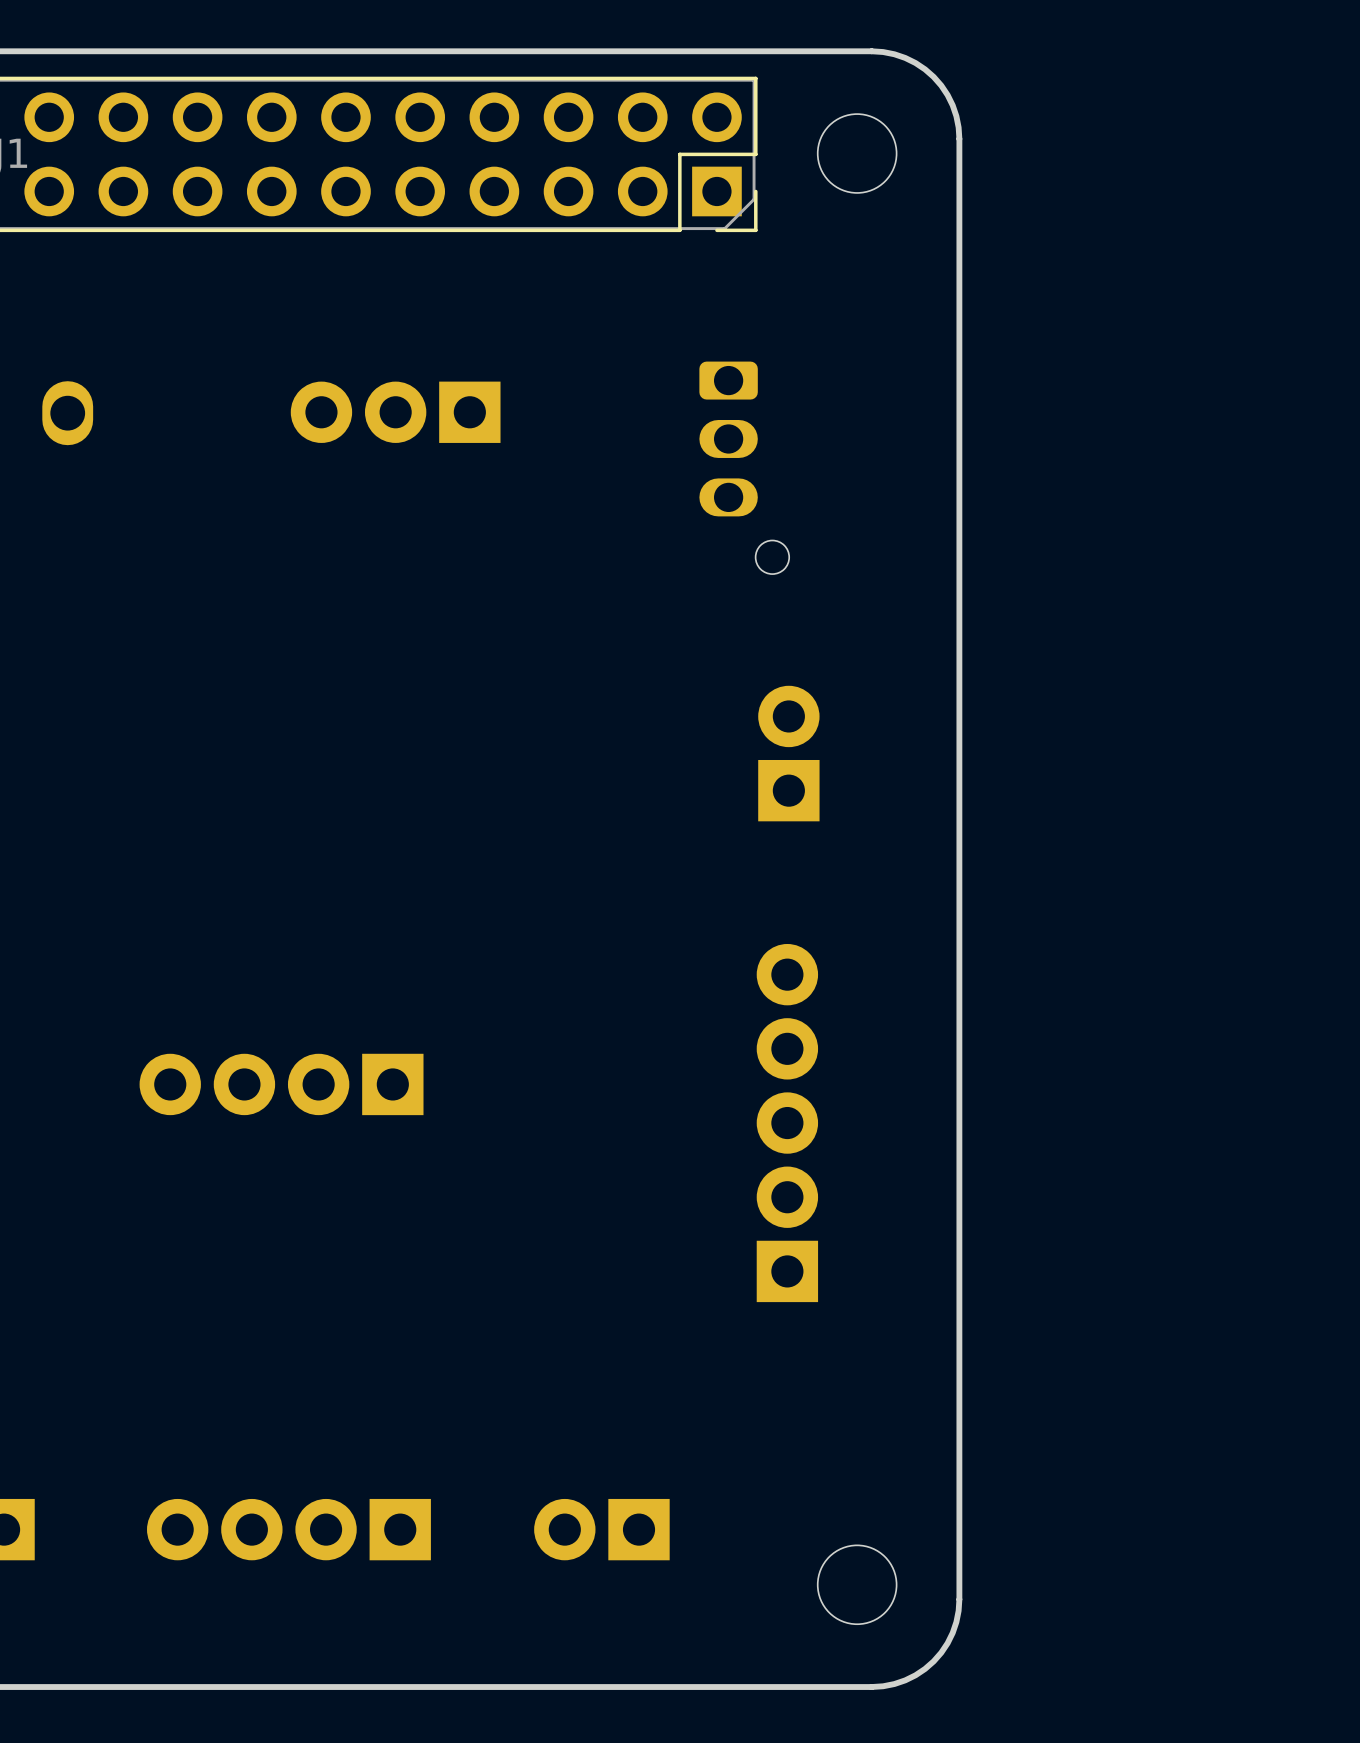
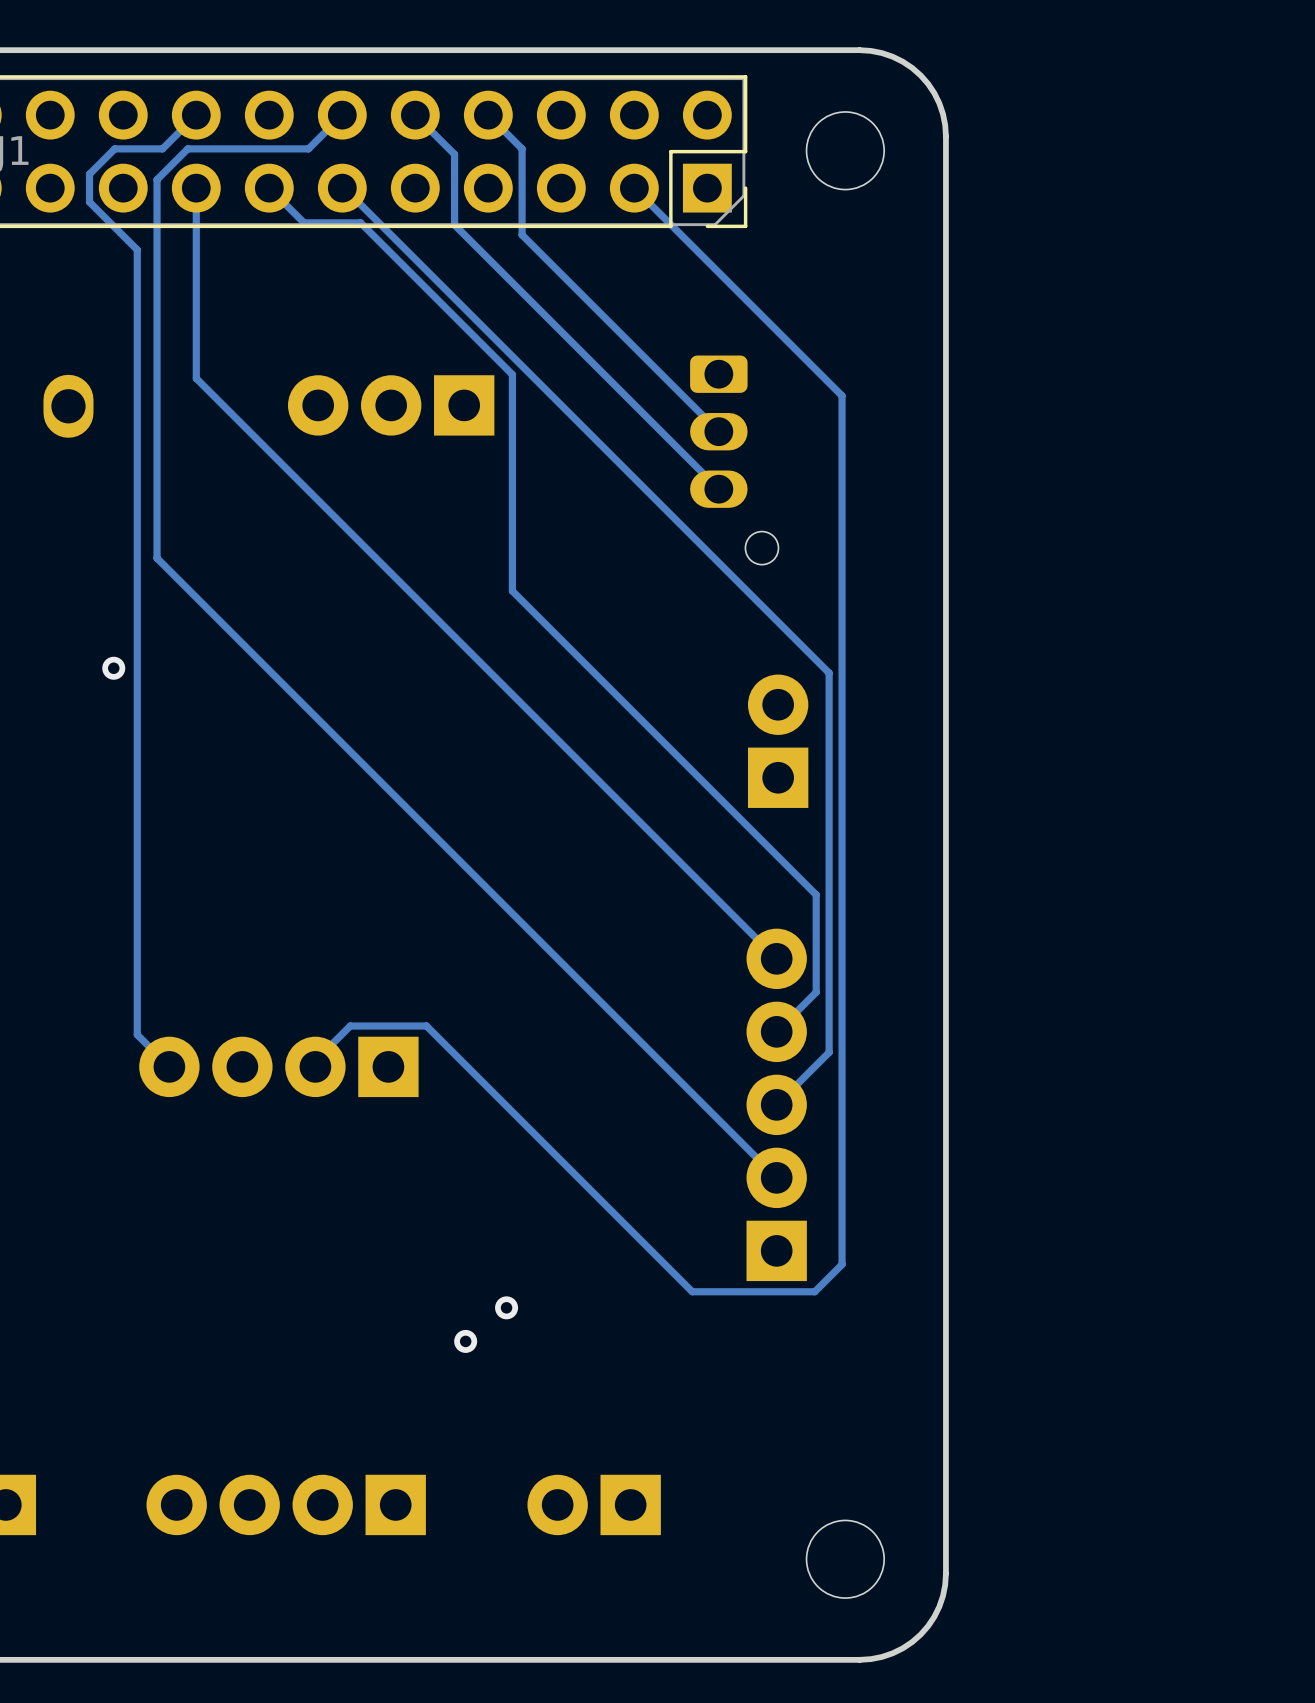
track: none -> (196, 115) (162, 148) (114, 148) (89, 174) (89, 202) (137, 249) (137, 1034) (169, 1066)
track: none -> (342, 115) (308, 148) (187, 148) (157, 179) (157, 558) (776, 1177)
track: none -> (415, 115) (454, 154) (454, 224) (718, 489)
track: none -> (488, 115) (522, 148) (522, 234) (718, 431)
track: none -> (196, 188) (196, 378) (776, 958)
track: none -> (269, 188) (304, 222) (360, 222) (512, 374) (512, 591) (816, 894) (816, 992) (776, 1031)
track: none -> (342, 188) (829, 673) (829, 1052) (776, 1104)
track: none -> (634, 188) (842, 395) (842, 1264) (814, 1291) (692, 1291) (426, 1026) (350, 1026) (315, 1060) (315, 1066)
via: none -> (113, 668)
via: none -> (506, 1307)
via: none -> (465, 1341)

